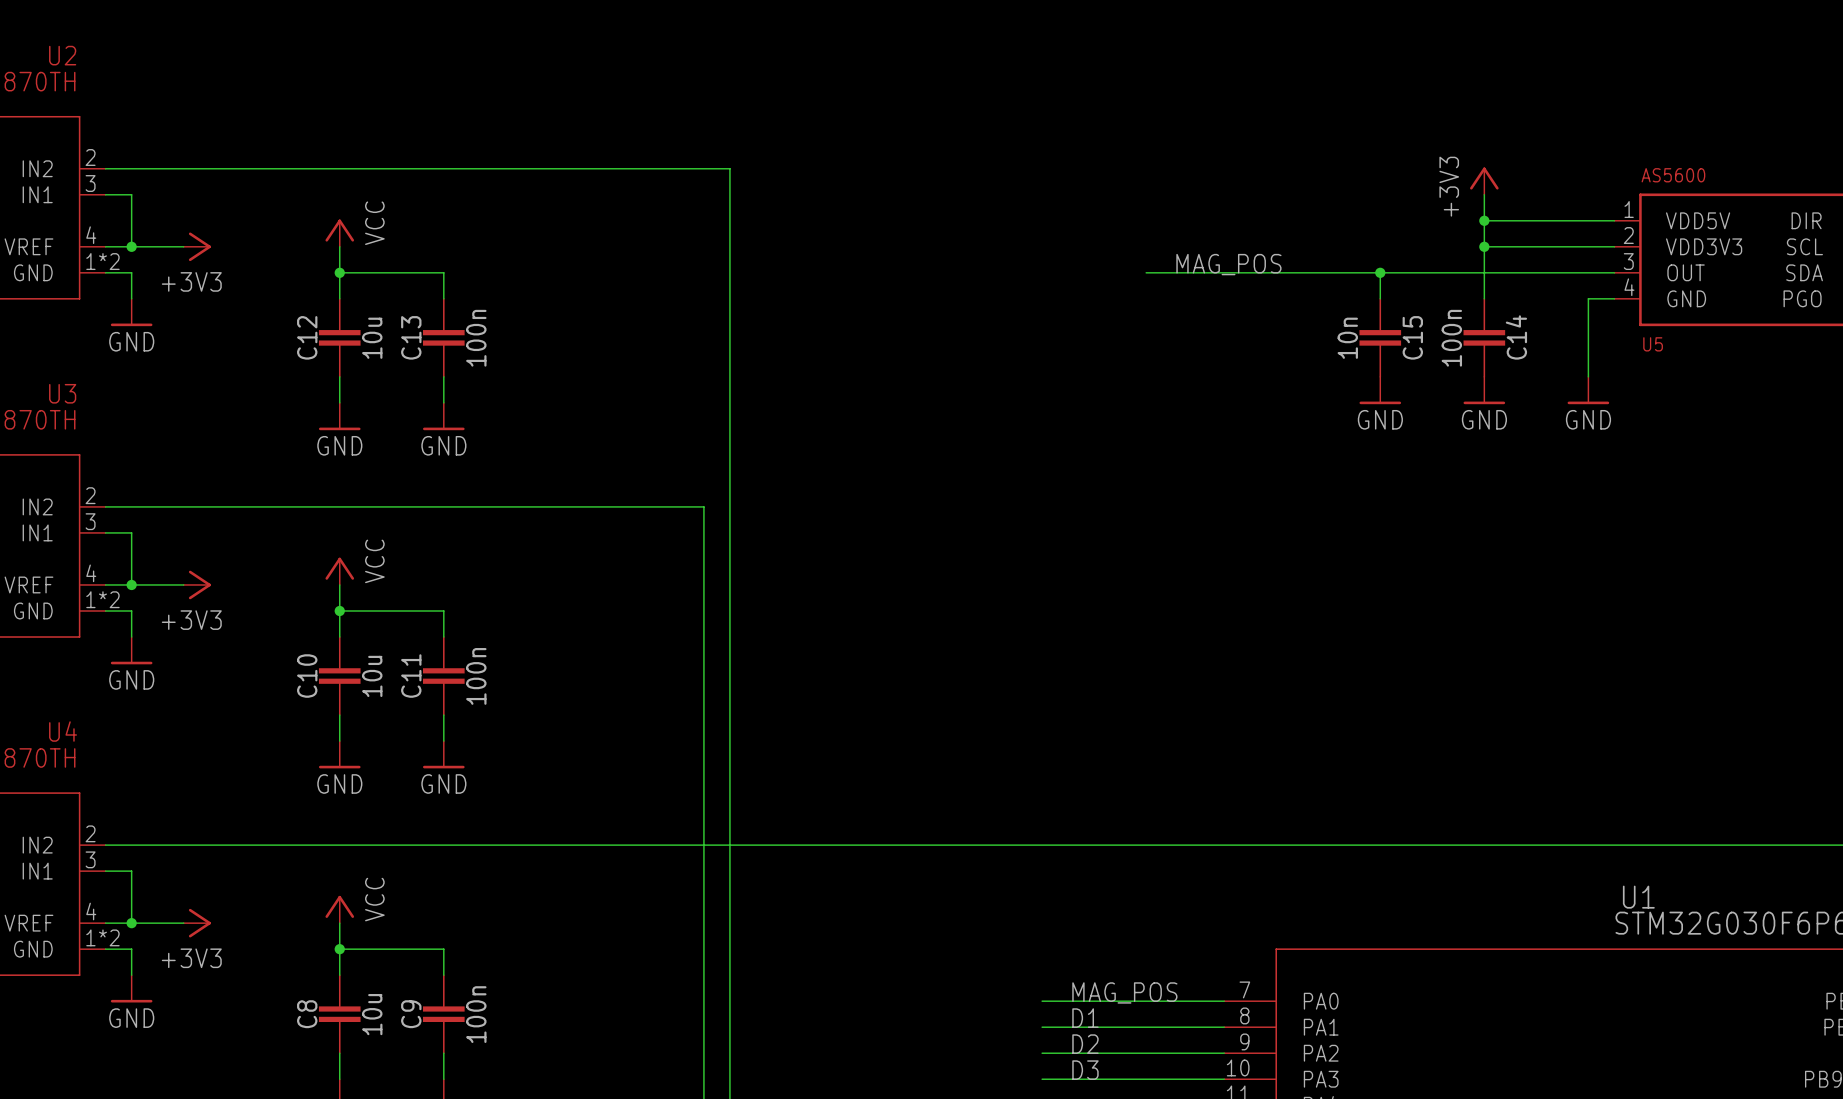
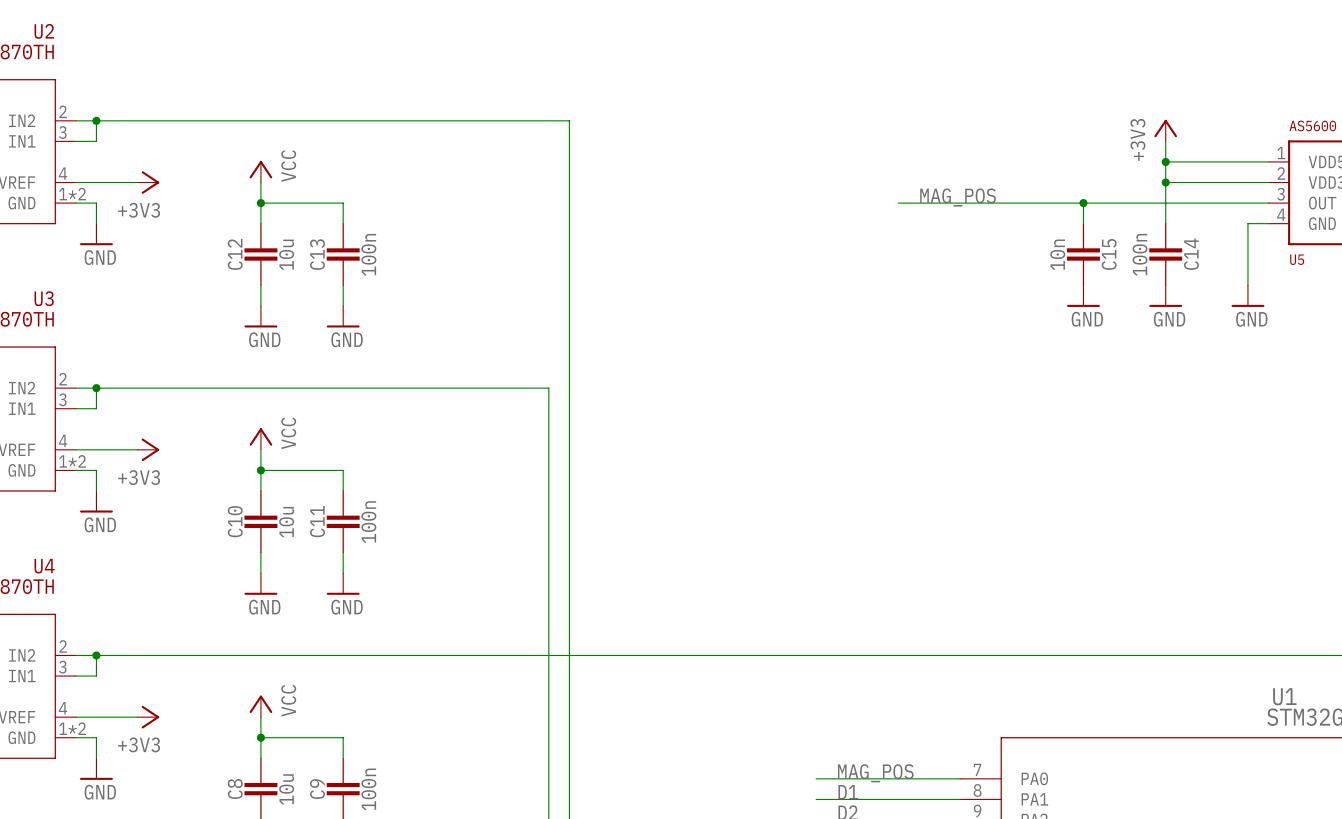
junction: none -> (96, 120)
wire: (131, 194) (131, 246) -> (96, 141) (96, 120)
junction: (131, 246) -> none
junction: none -> (96, 388)
wire: (131, 532) (131, 584) -> (96, 408) (96, 388)
junction: (131, 584) -> none
junction: none -> (96, 655)
wire: (131, 871) (131, 923) -> (96, 676) (96, 655)
junction: (131, 923) -> none

